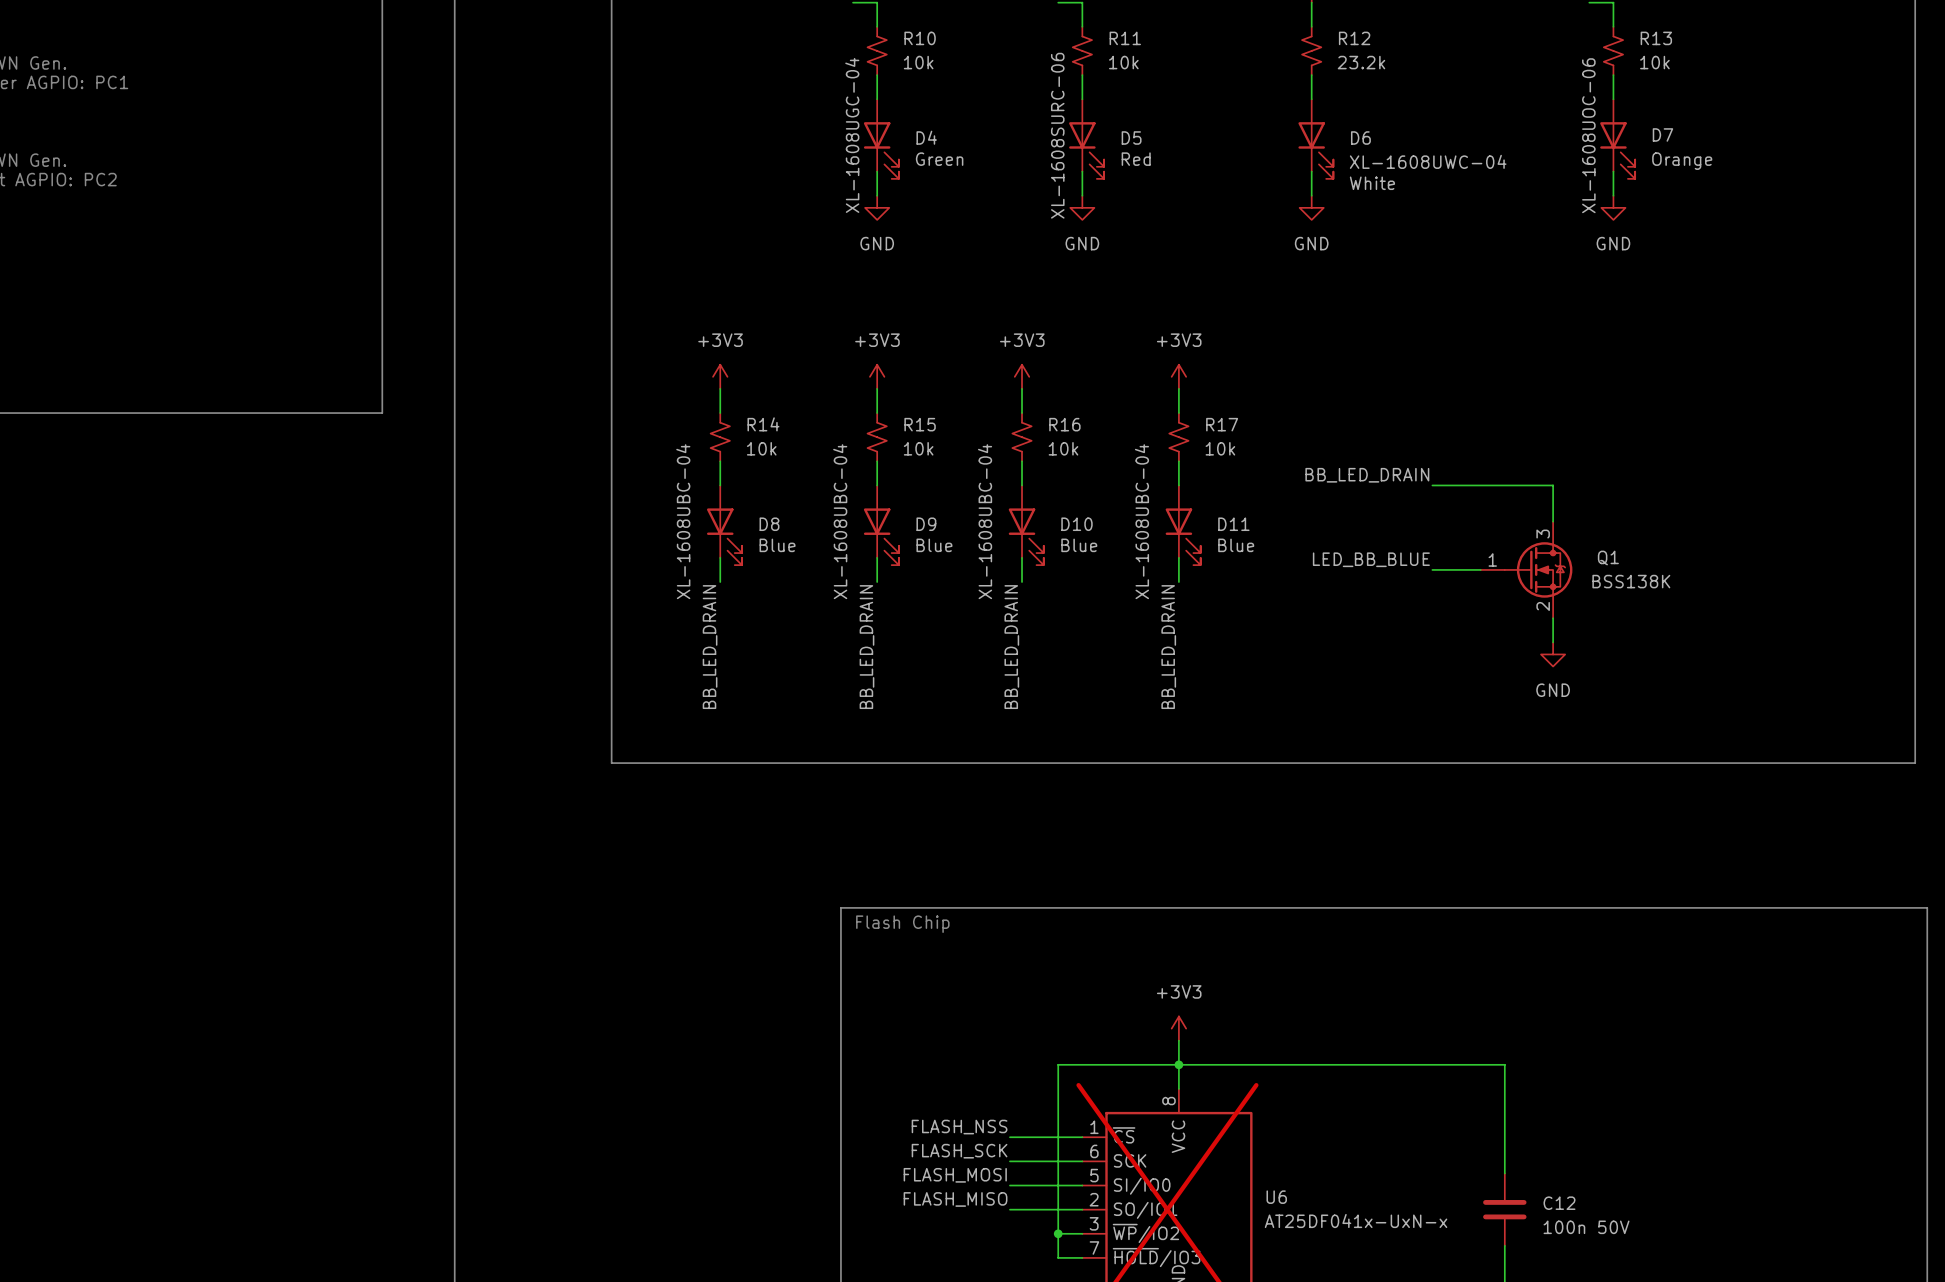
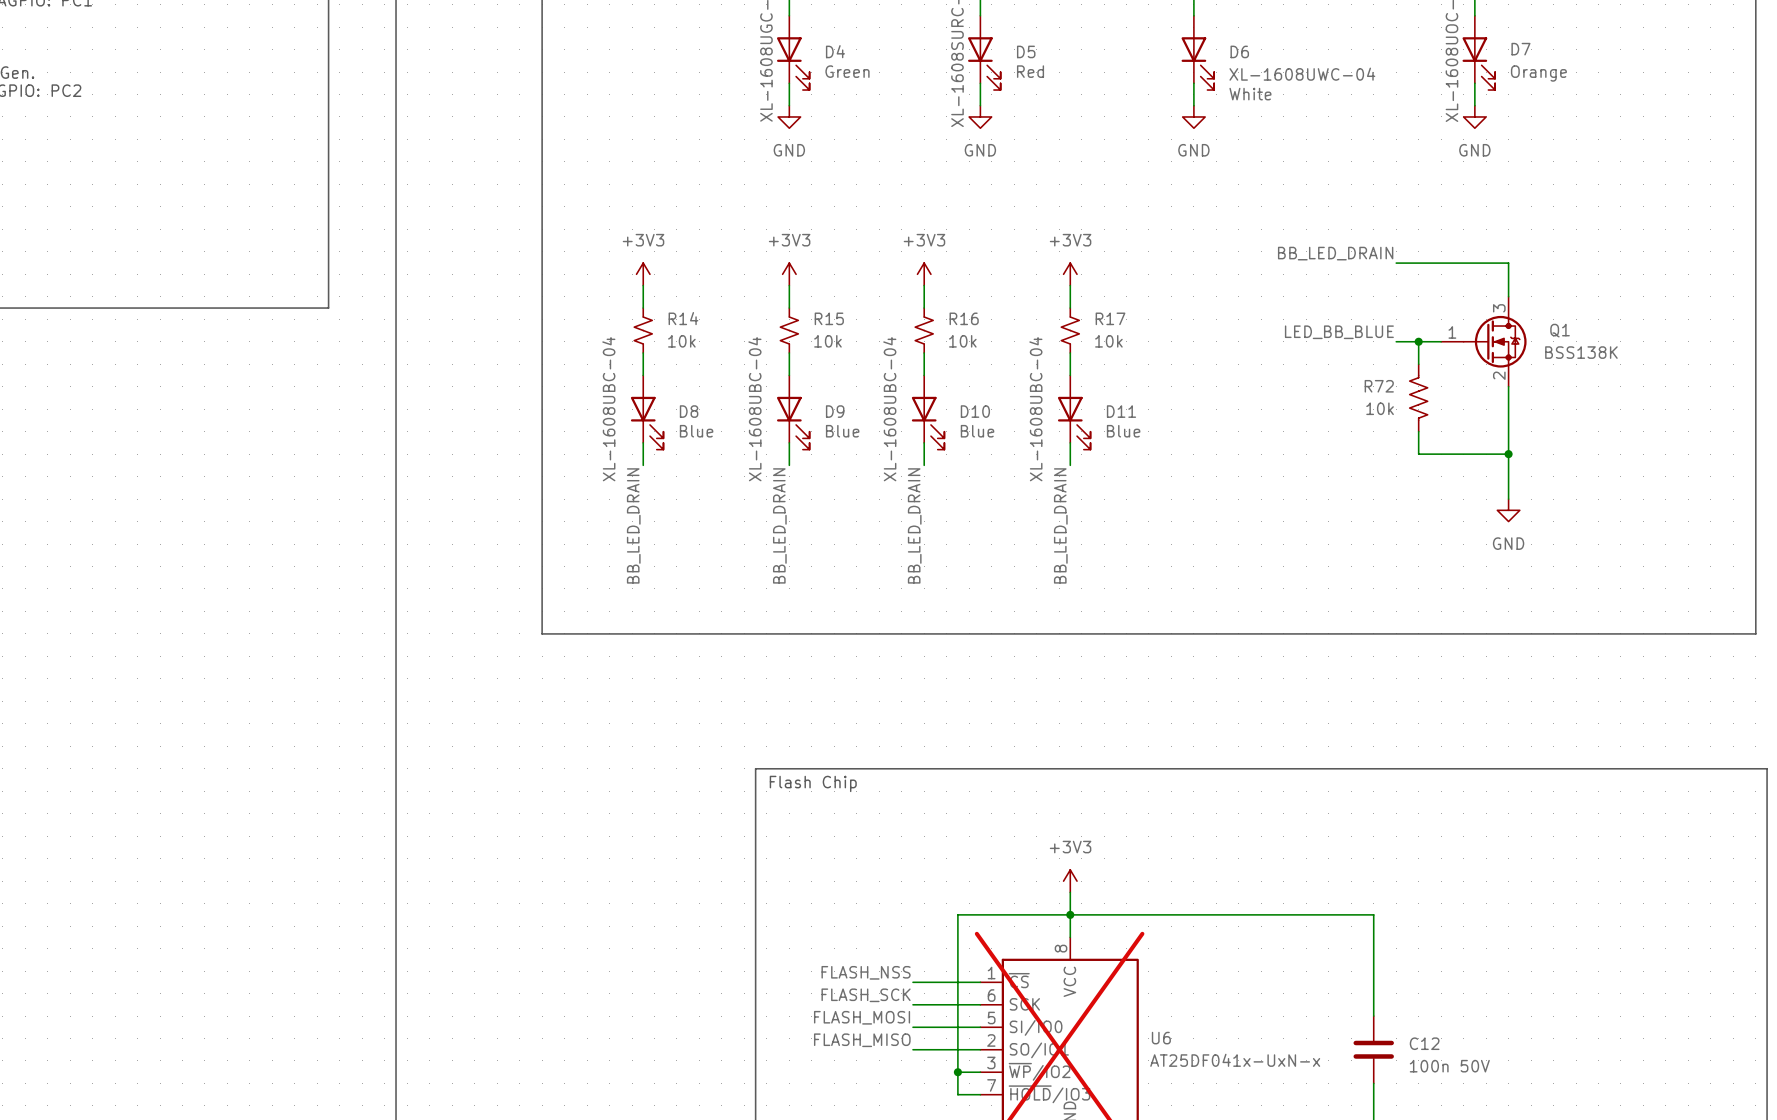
junction: none -> (1418, 341)
label position: BB_LED_DRAIN (1367, 475) -> BB_LED_DRAIN (1335, 253)
wire: (1432, 485) (1553, 485) (1553, 521) -> (1396, 263) (1508, 263) (1508, 296)
wire: none -> (1508, 386) (1508, 499)
R72: none -> 10k (1418, 397)
wire: none -> (1418, 431) (1418, 454) (1508, 454)
label position: LED_BB_BLUE (1371, 559) -> LED_BB_BLUE (1339, 332)
wire: (1432, 569) (1480, 569) -> (1396, 341) (1441, 341)
Q1 position: (1526, 569) -> (1483, 341)
junction: none -> (1508, 454)
wire: (1553, 618) (1553, 642) -> (1418, 341) (1418, 364)
power symbol position: GND (1553, 654) -> GND (1508, 510)

